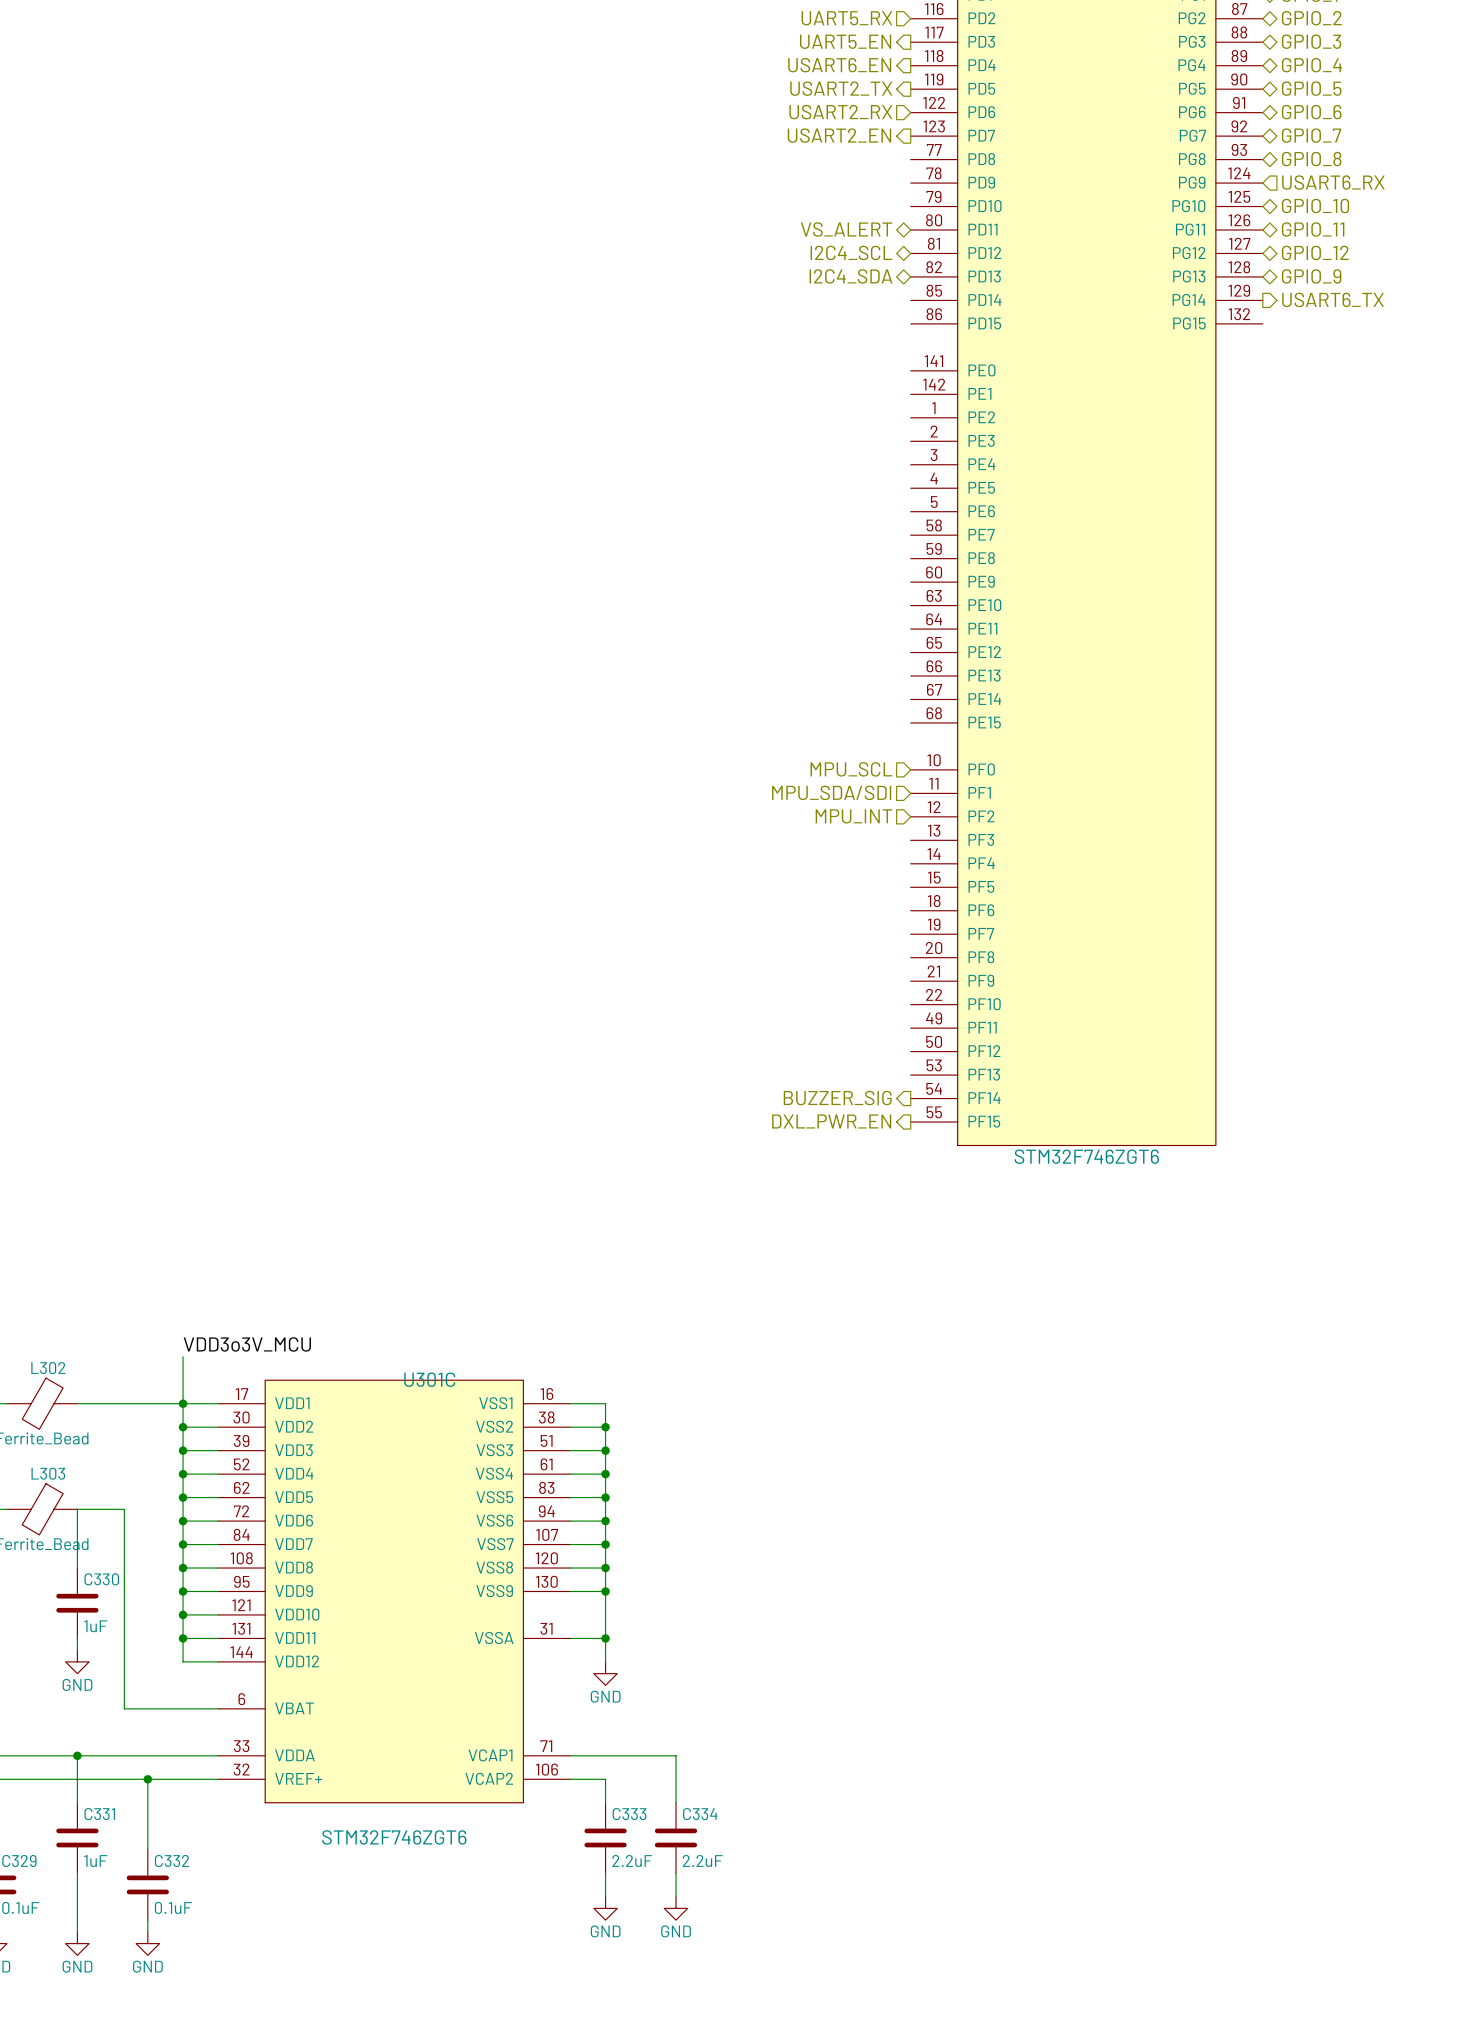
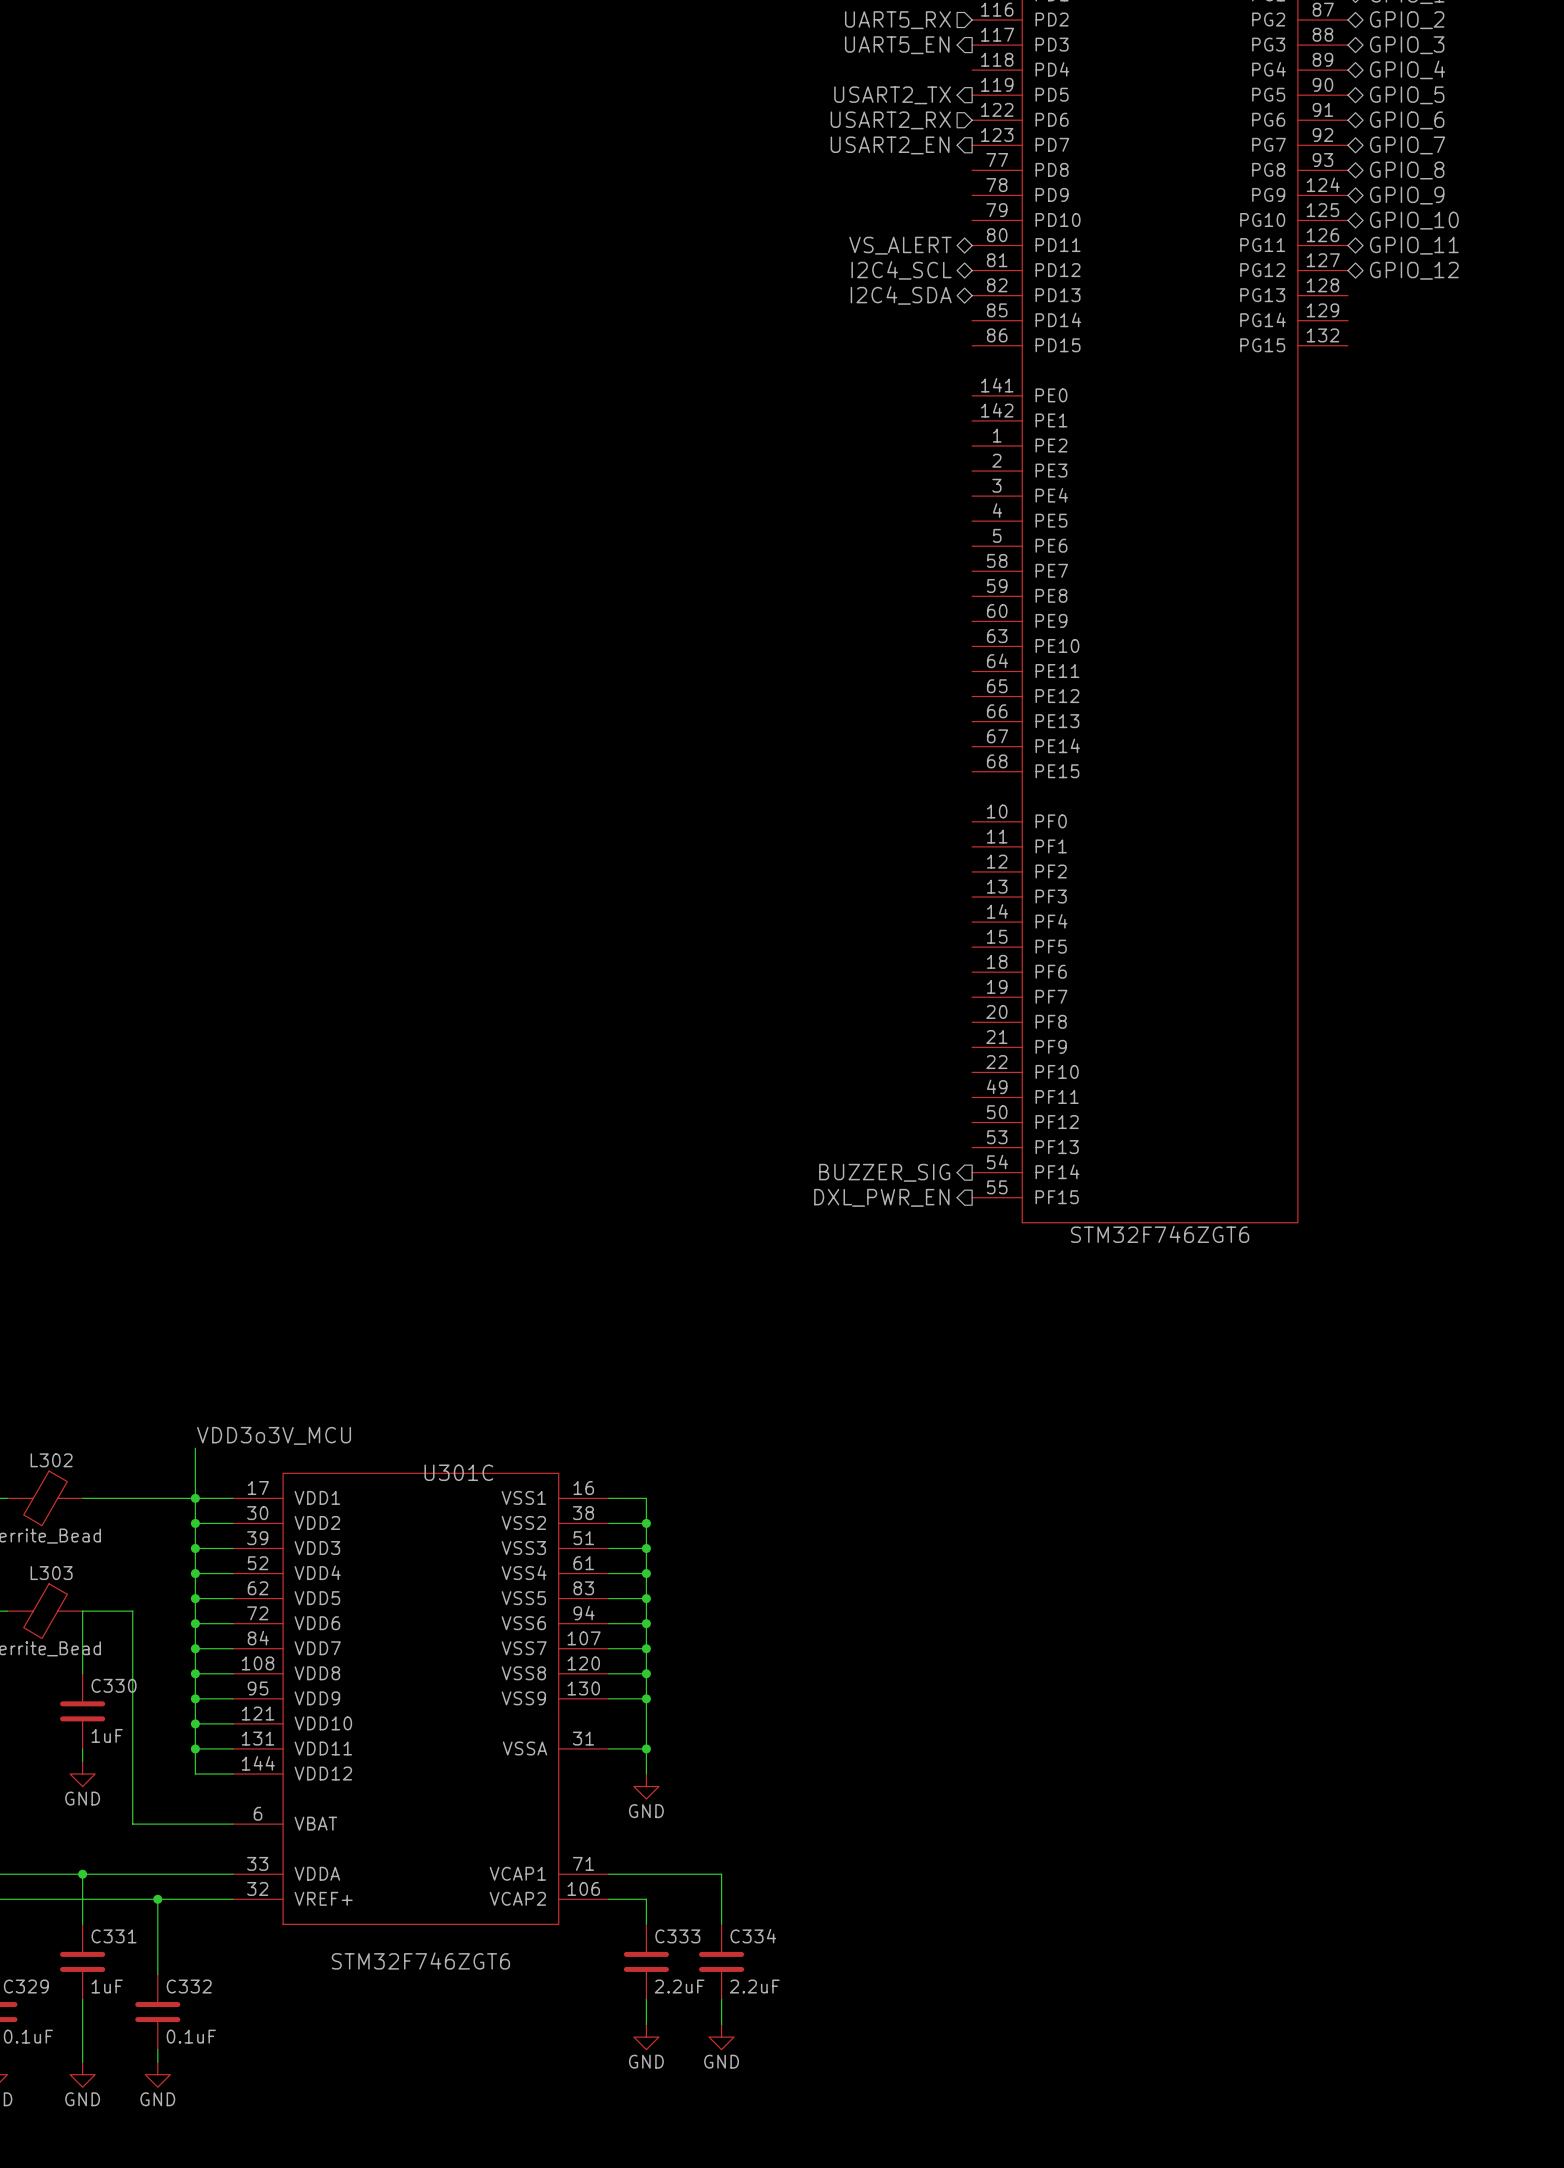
hierarchical label: USART6_EN (839, 65) -> none
hierarchical label shape: input (1333, 182) -> bidirectional (1407, 195)
hierarchical label: USART6_RX (1333, 182) -> GPIO_9 (1407, 195)
hierarchical label: GPIO_9 (1311, 276) -> none
hierarchical label: USART6_TX (1333, 299) -> none
hierarchical label: MPU_SCL (851, 769) -> none
hierarchical label: MPU_SDA/SDI (831, 792) -> none
hierarchical label: MPU_INT (853, 816) -> none

